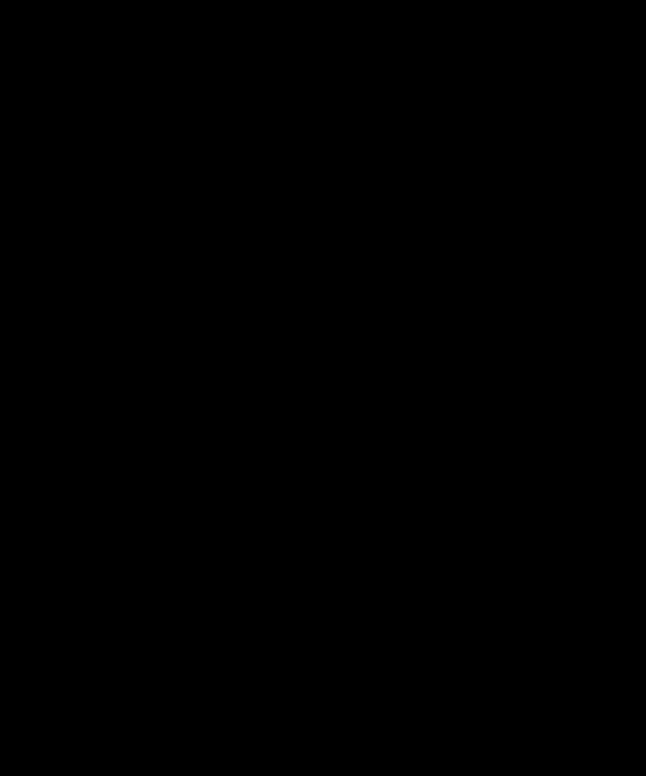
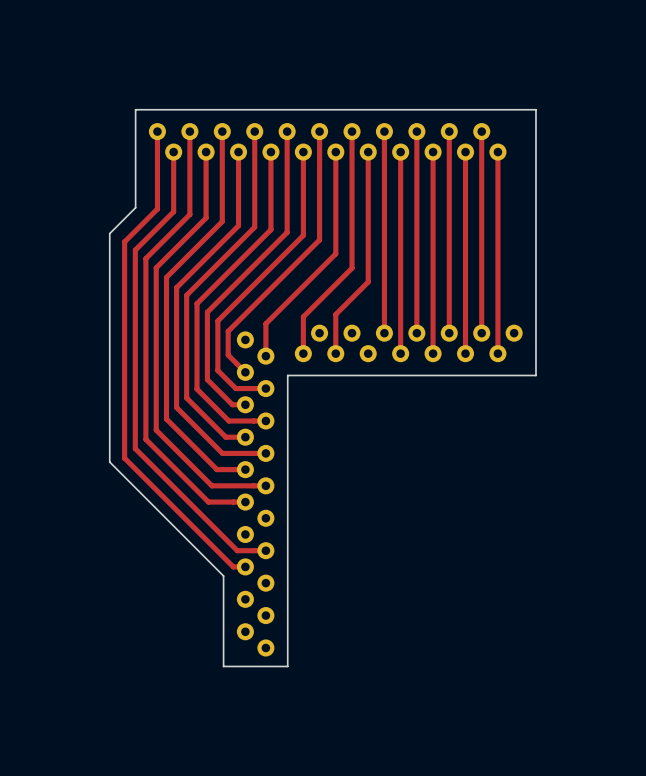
board edge: none -> (535, 109) (535, 375) (287, 375) (287, 666) (223, 666) (223, 575) (109, 462) (109, 233) (135, 207) (135, 109) (535, 109)
top track: none -> (157, 131) (157, 209) (124, 241) (124, 458) (233, 566) (245, 566)
top track: none -> (189, 131) (189, 214) (145, 258) (145, 439) (208, 502) (245, 502)
top track: none -> (222, 131) (222, 221) (166, 277) (166, 419) (217, 469) (245, 469)
top track: none -> (254, 131) (254, 227) (186, 295) (186, 398) (225, 437) (245, 437)
top track: none -> (287, 131) (287, 232) (207, 312) (207, 379) (232, 404) (245, 404)
top track: none -> (319, 131) (319, 239) (228, 331) (228, 355) (245, 372)
top track: none -> (352, 131) (352, 268) (303, 316) (303, 353)
top track: none -> (384, 131) (384, 333)
top track: none -> (416, 131) (416, 333)
top track: none -> (449, 131) (449, 333)
top track: none -> (481, 131) (481, 333)
part: none -> (327, 141)
top track: none -> (173, 152) (173, 211) (135, 250) (135, 448) (237, 550) (265, 550)
top track: none -> (206, 152) (206, 218) (156, 267) (156, 430) (211, 485) (265, 485)
top track: none -> (238, 152) (238, 225) (176, 287) (176, 407) (222, 453) (265, 453)
top track: none -> (270, 152) (270, 229) (197, 303) (197, 389) (228, 420) (265, 420)
top track: none -> (303, 152) (303, 235) (217, 320) (217, 370) (235, 388) (265, 388)
top track: none -> (335, 152) (335, 253) (265, 323) (265, 356)
top track: none -> (368, 152) (368, 282) (335, 314) (335, 353)
top track: none -> (400, 152) (400, 353)
top track: none -> (433, 152) (433, 353)
top track: none -> (465, 152) (465, 353)
top track: none -> (497, 152) (497, 353)
part: none -> (408, 343)
part: none -> (255, 493)

